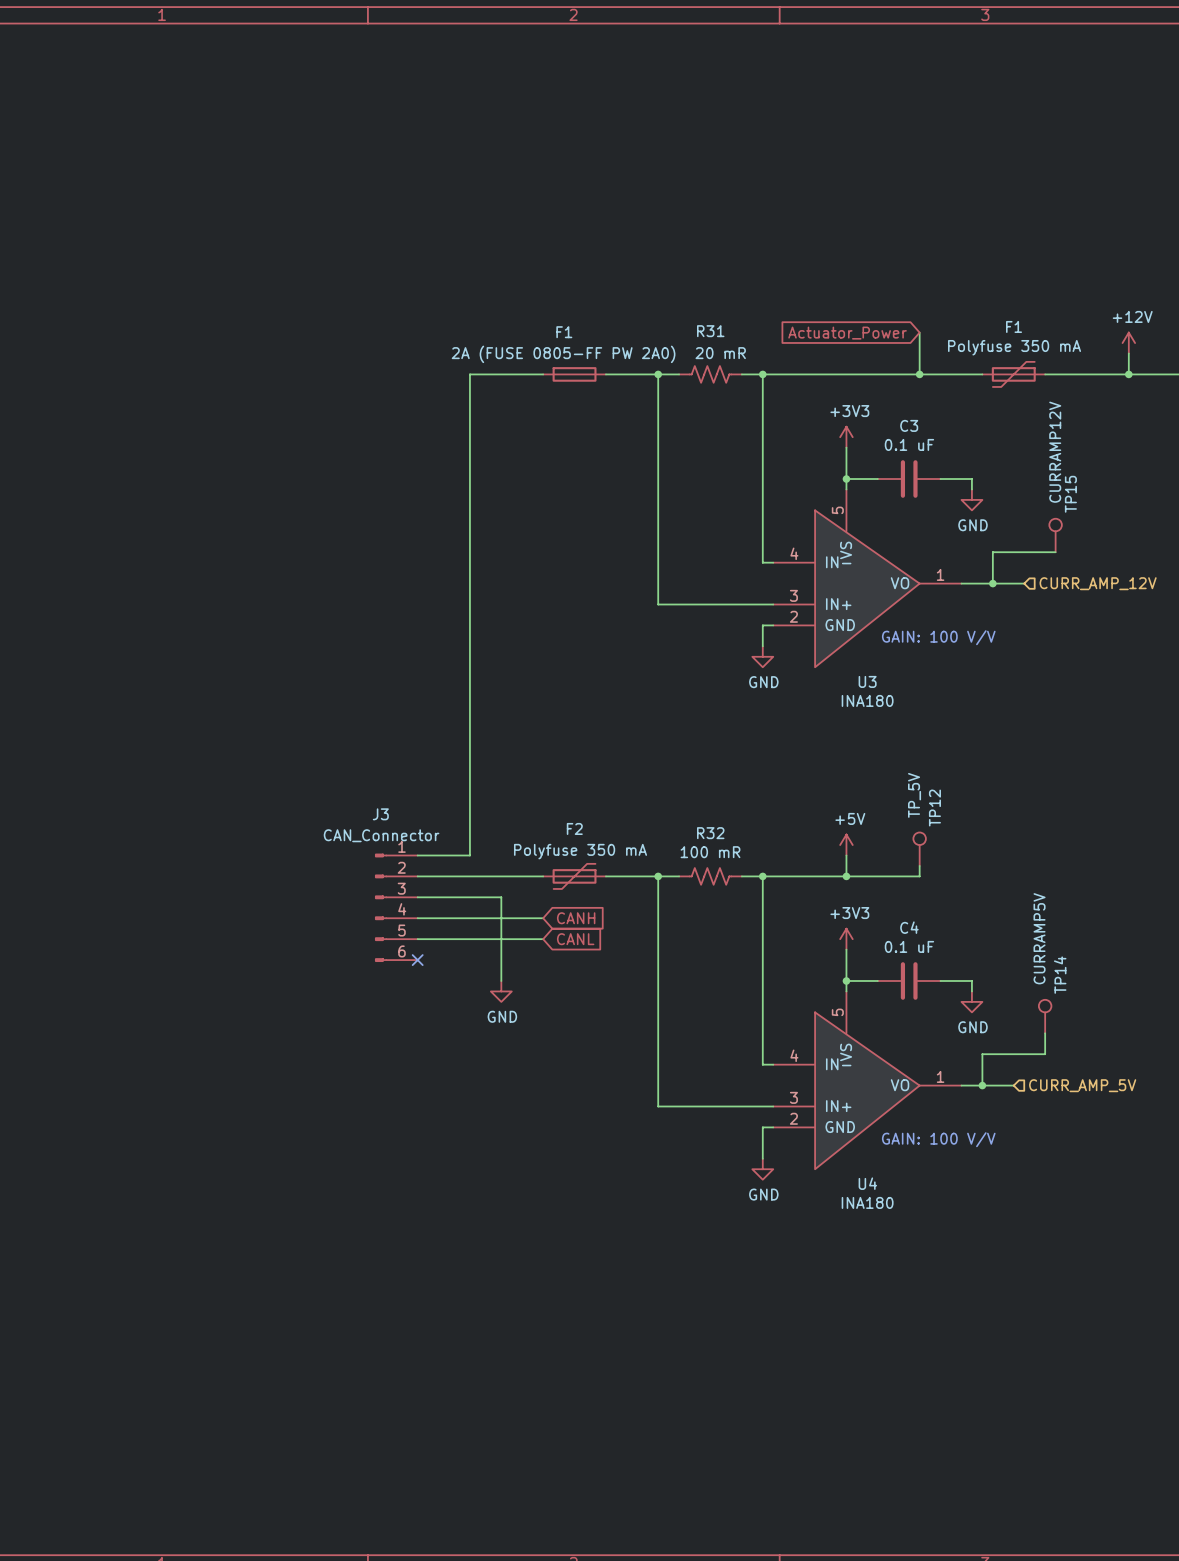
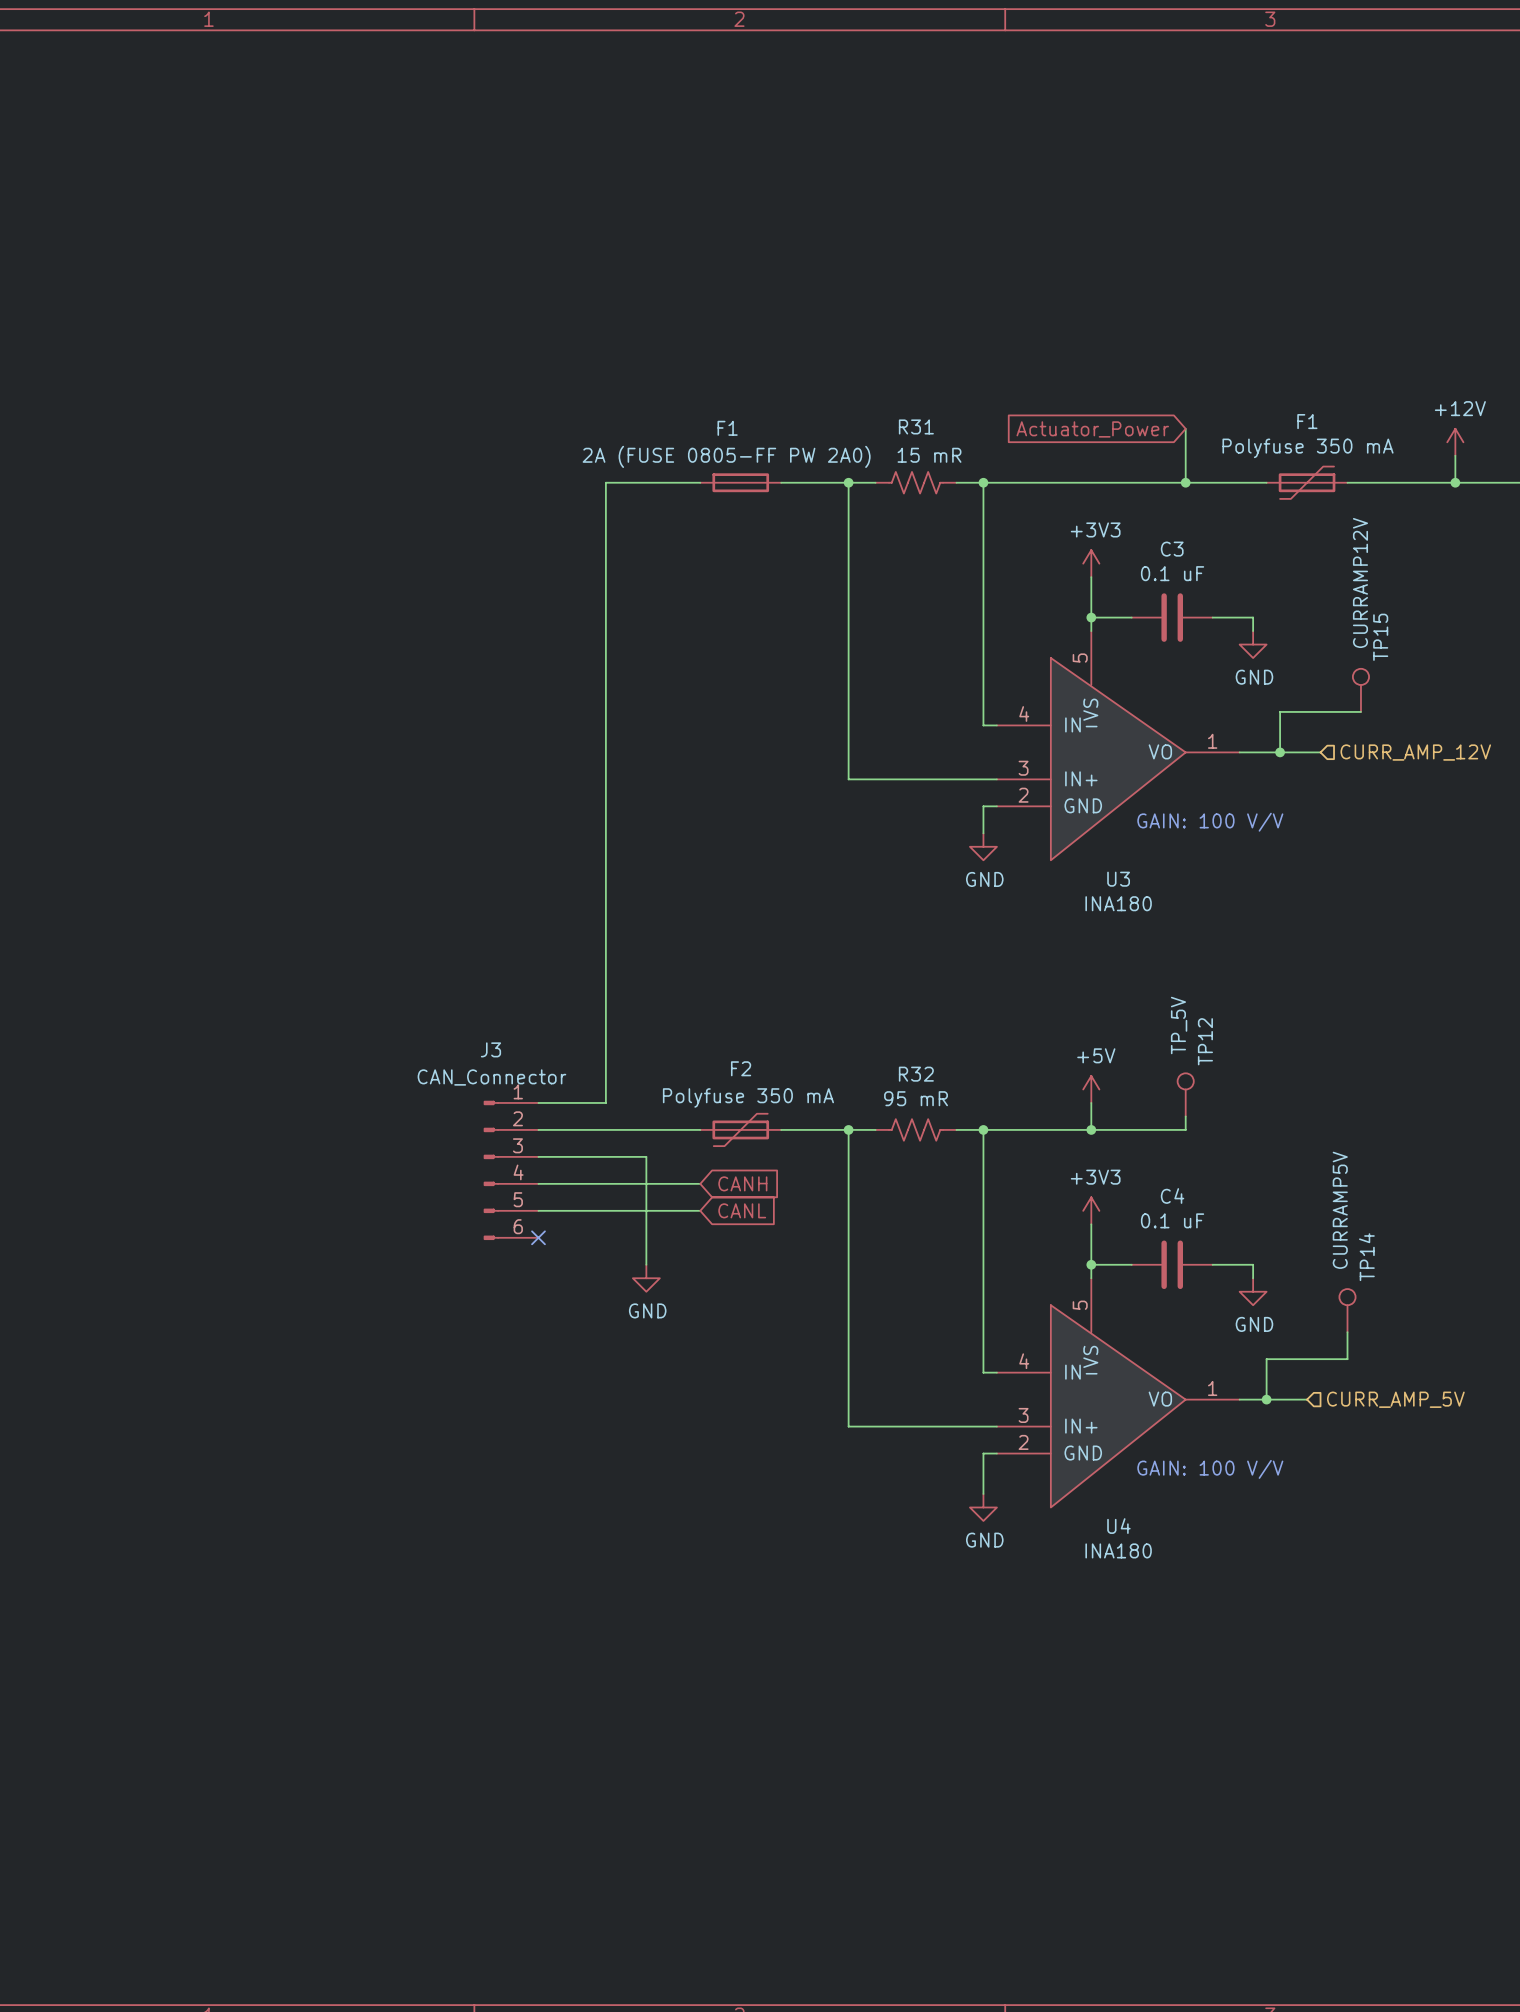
R31 value: 20 mR (720, 353) -> 15 mR (929, 455)
R32 value: 100 mR (710, 852) -> 95 mR (916, 1098)

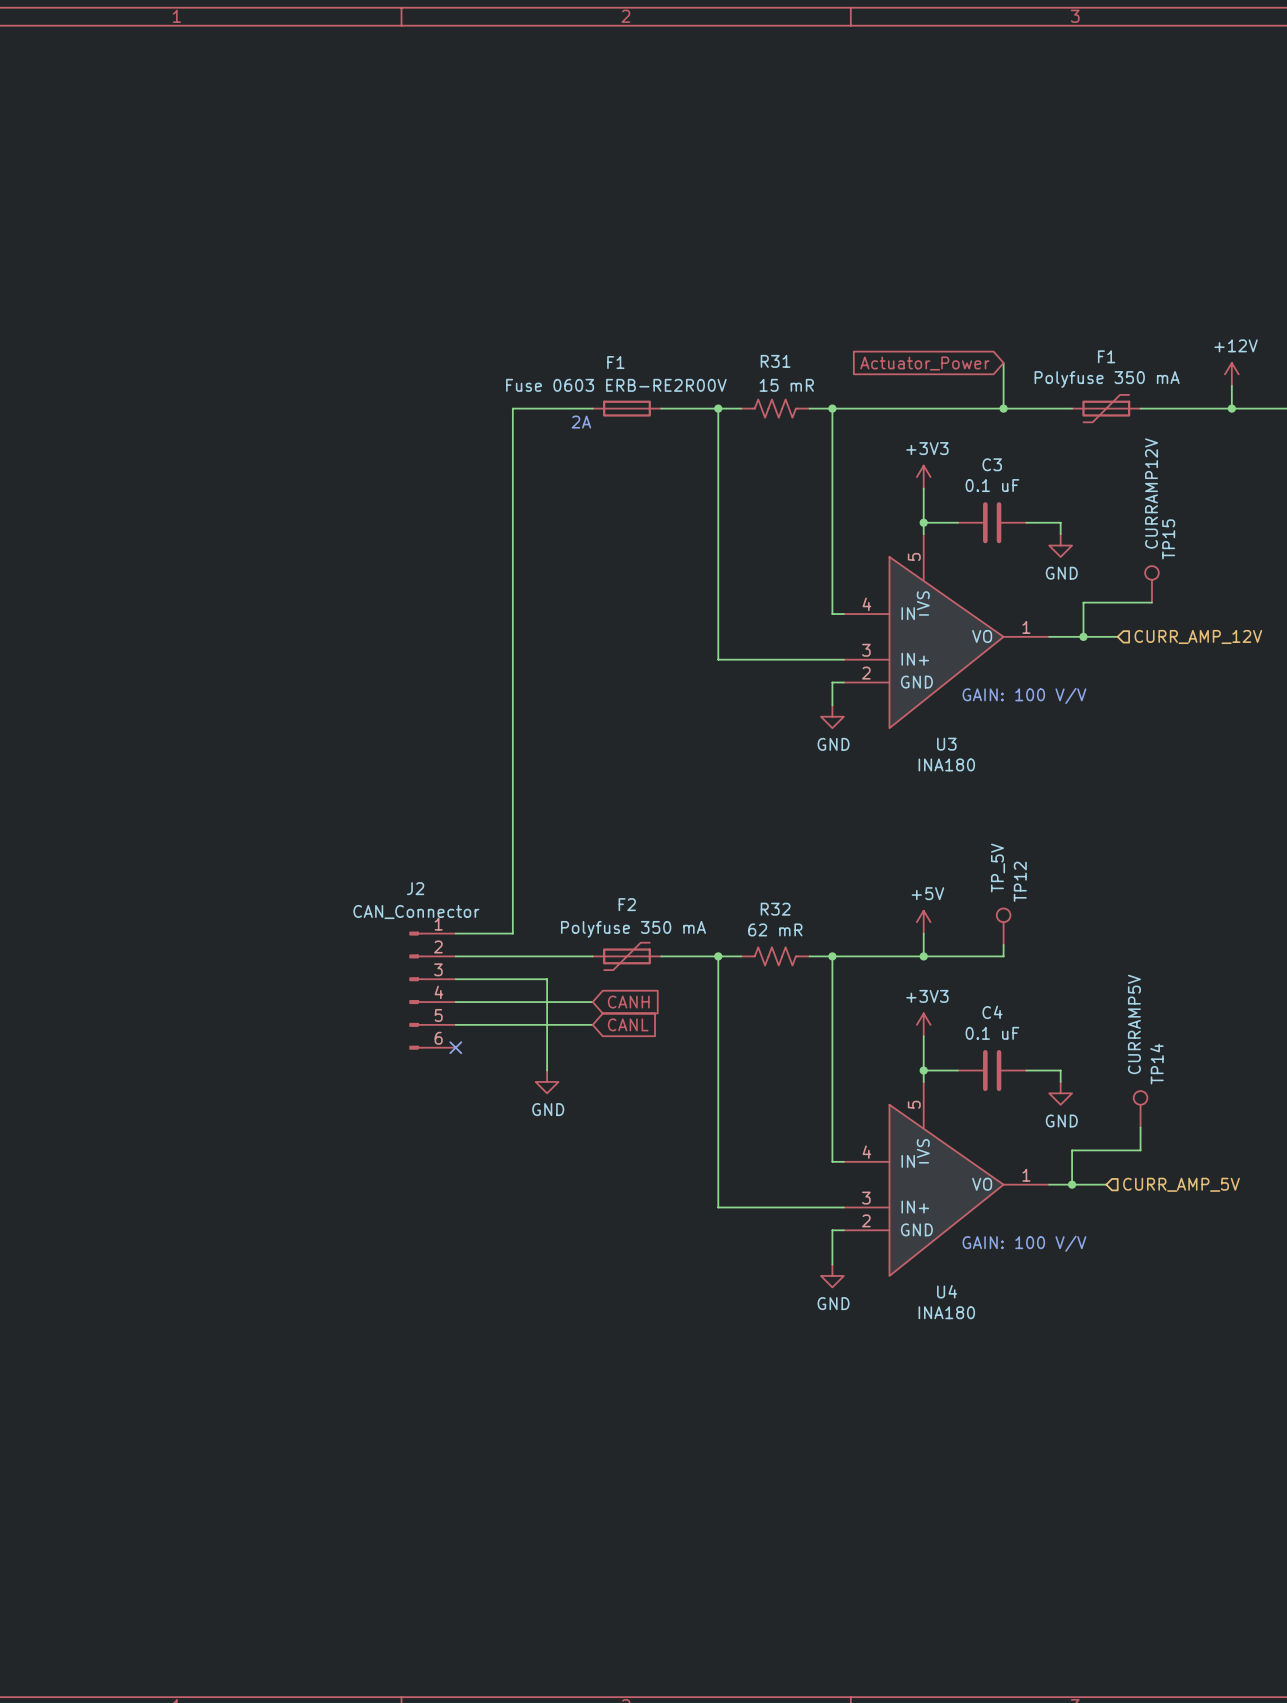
F1 value: 2A (FUSE 0805-FF PW 2A0) (726, 456) -> Fuse 0603 ERB-RE2R00V (616, 385)
text: none -> 2A (581, 422)
J3 name: J3 (490, 1049) -> J2 (415, 888)
R32 value: 95 mR (916, 1098) -> 62 mR (775, 929)

